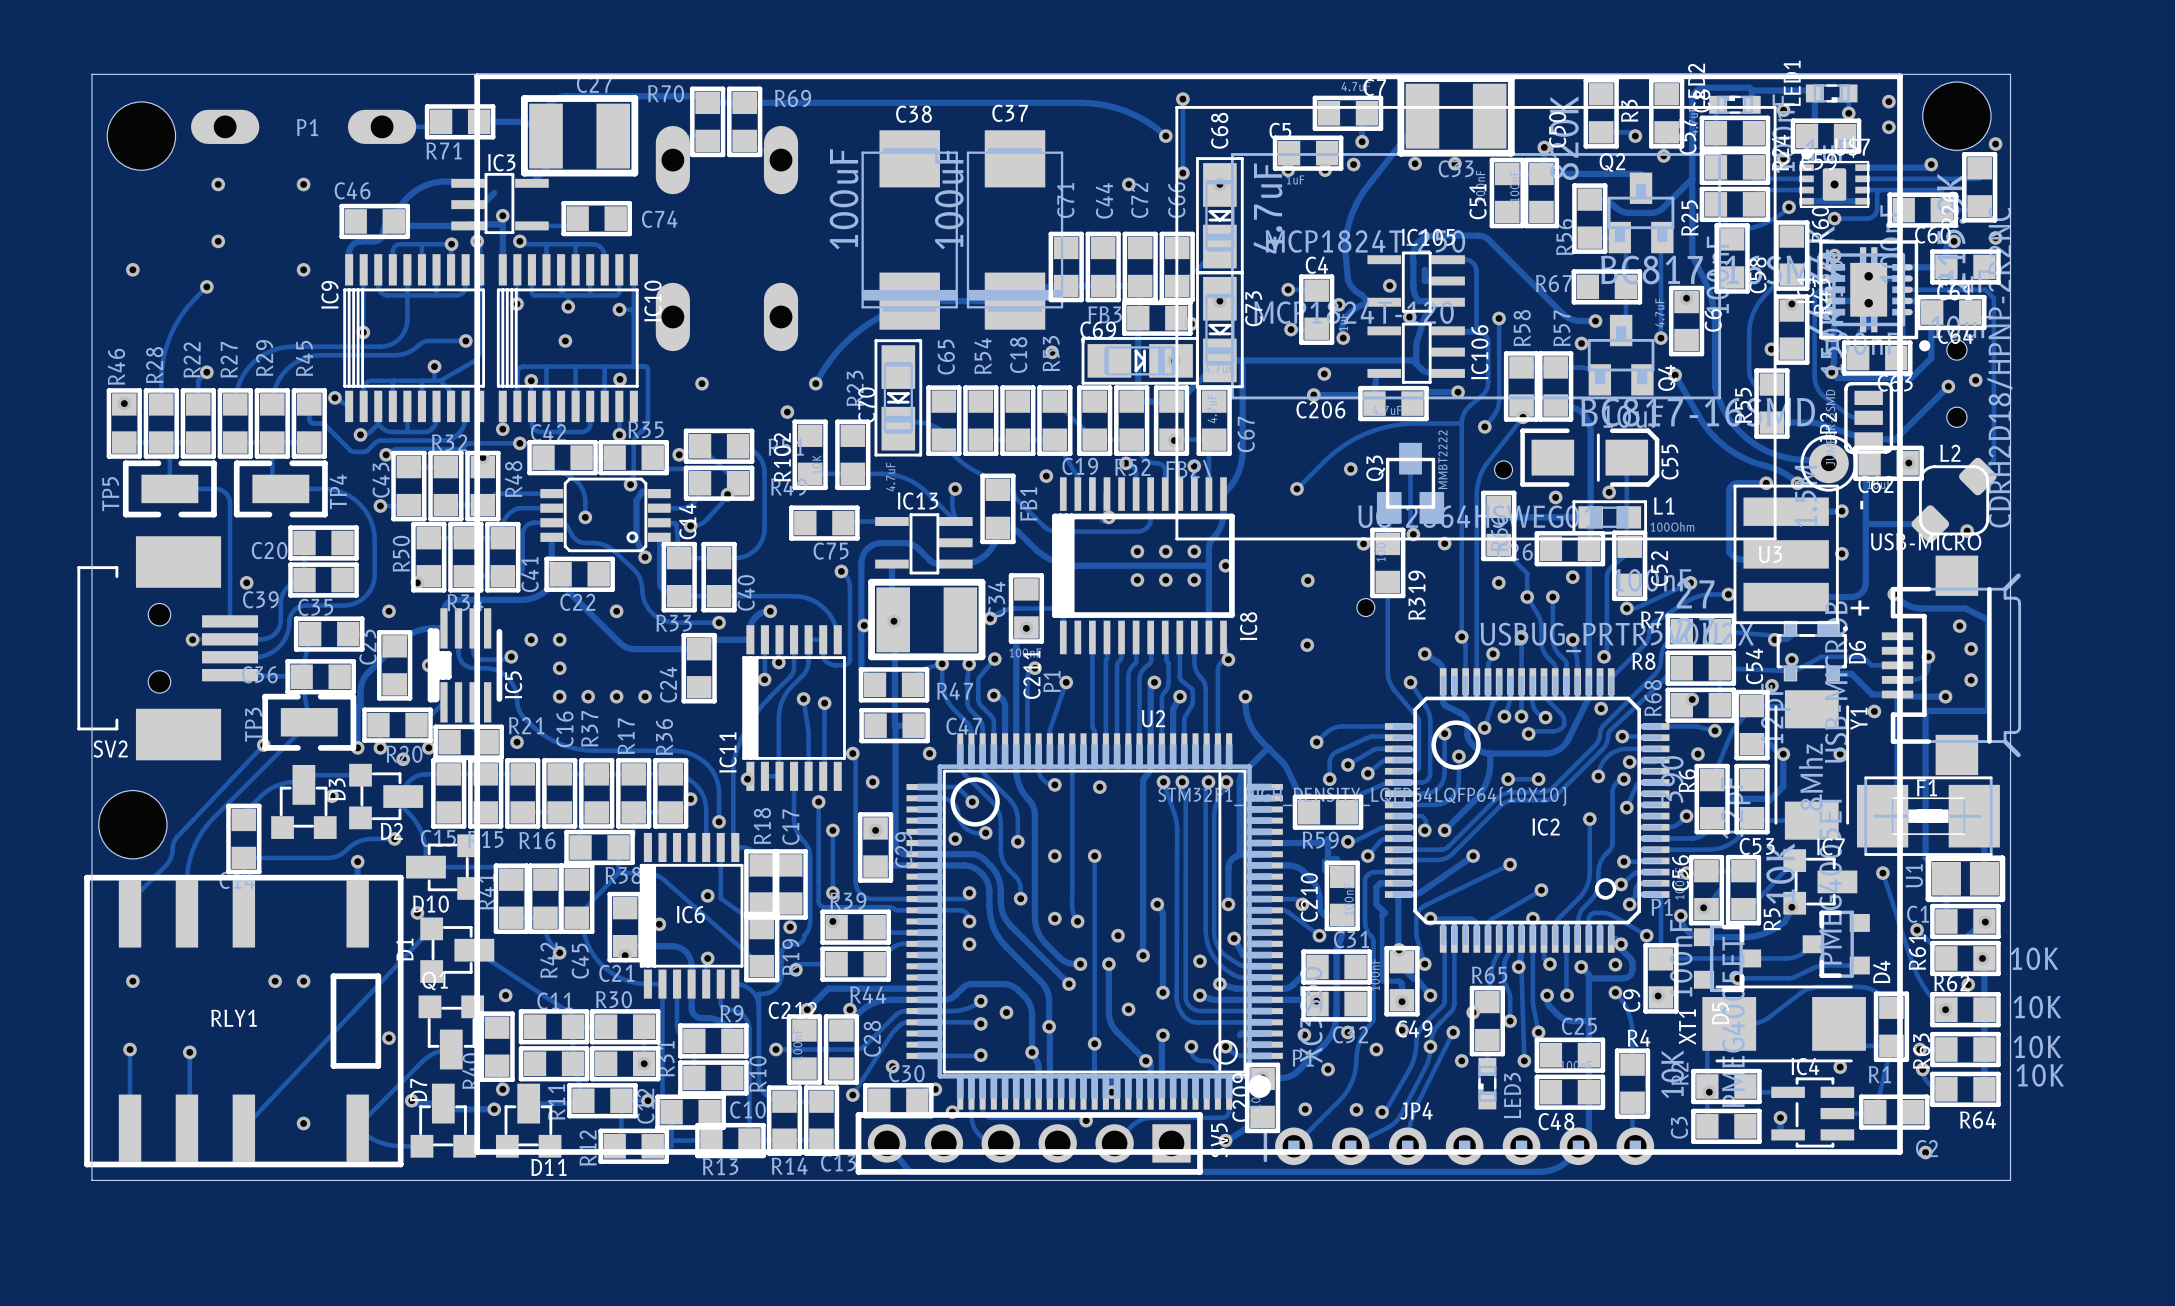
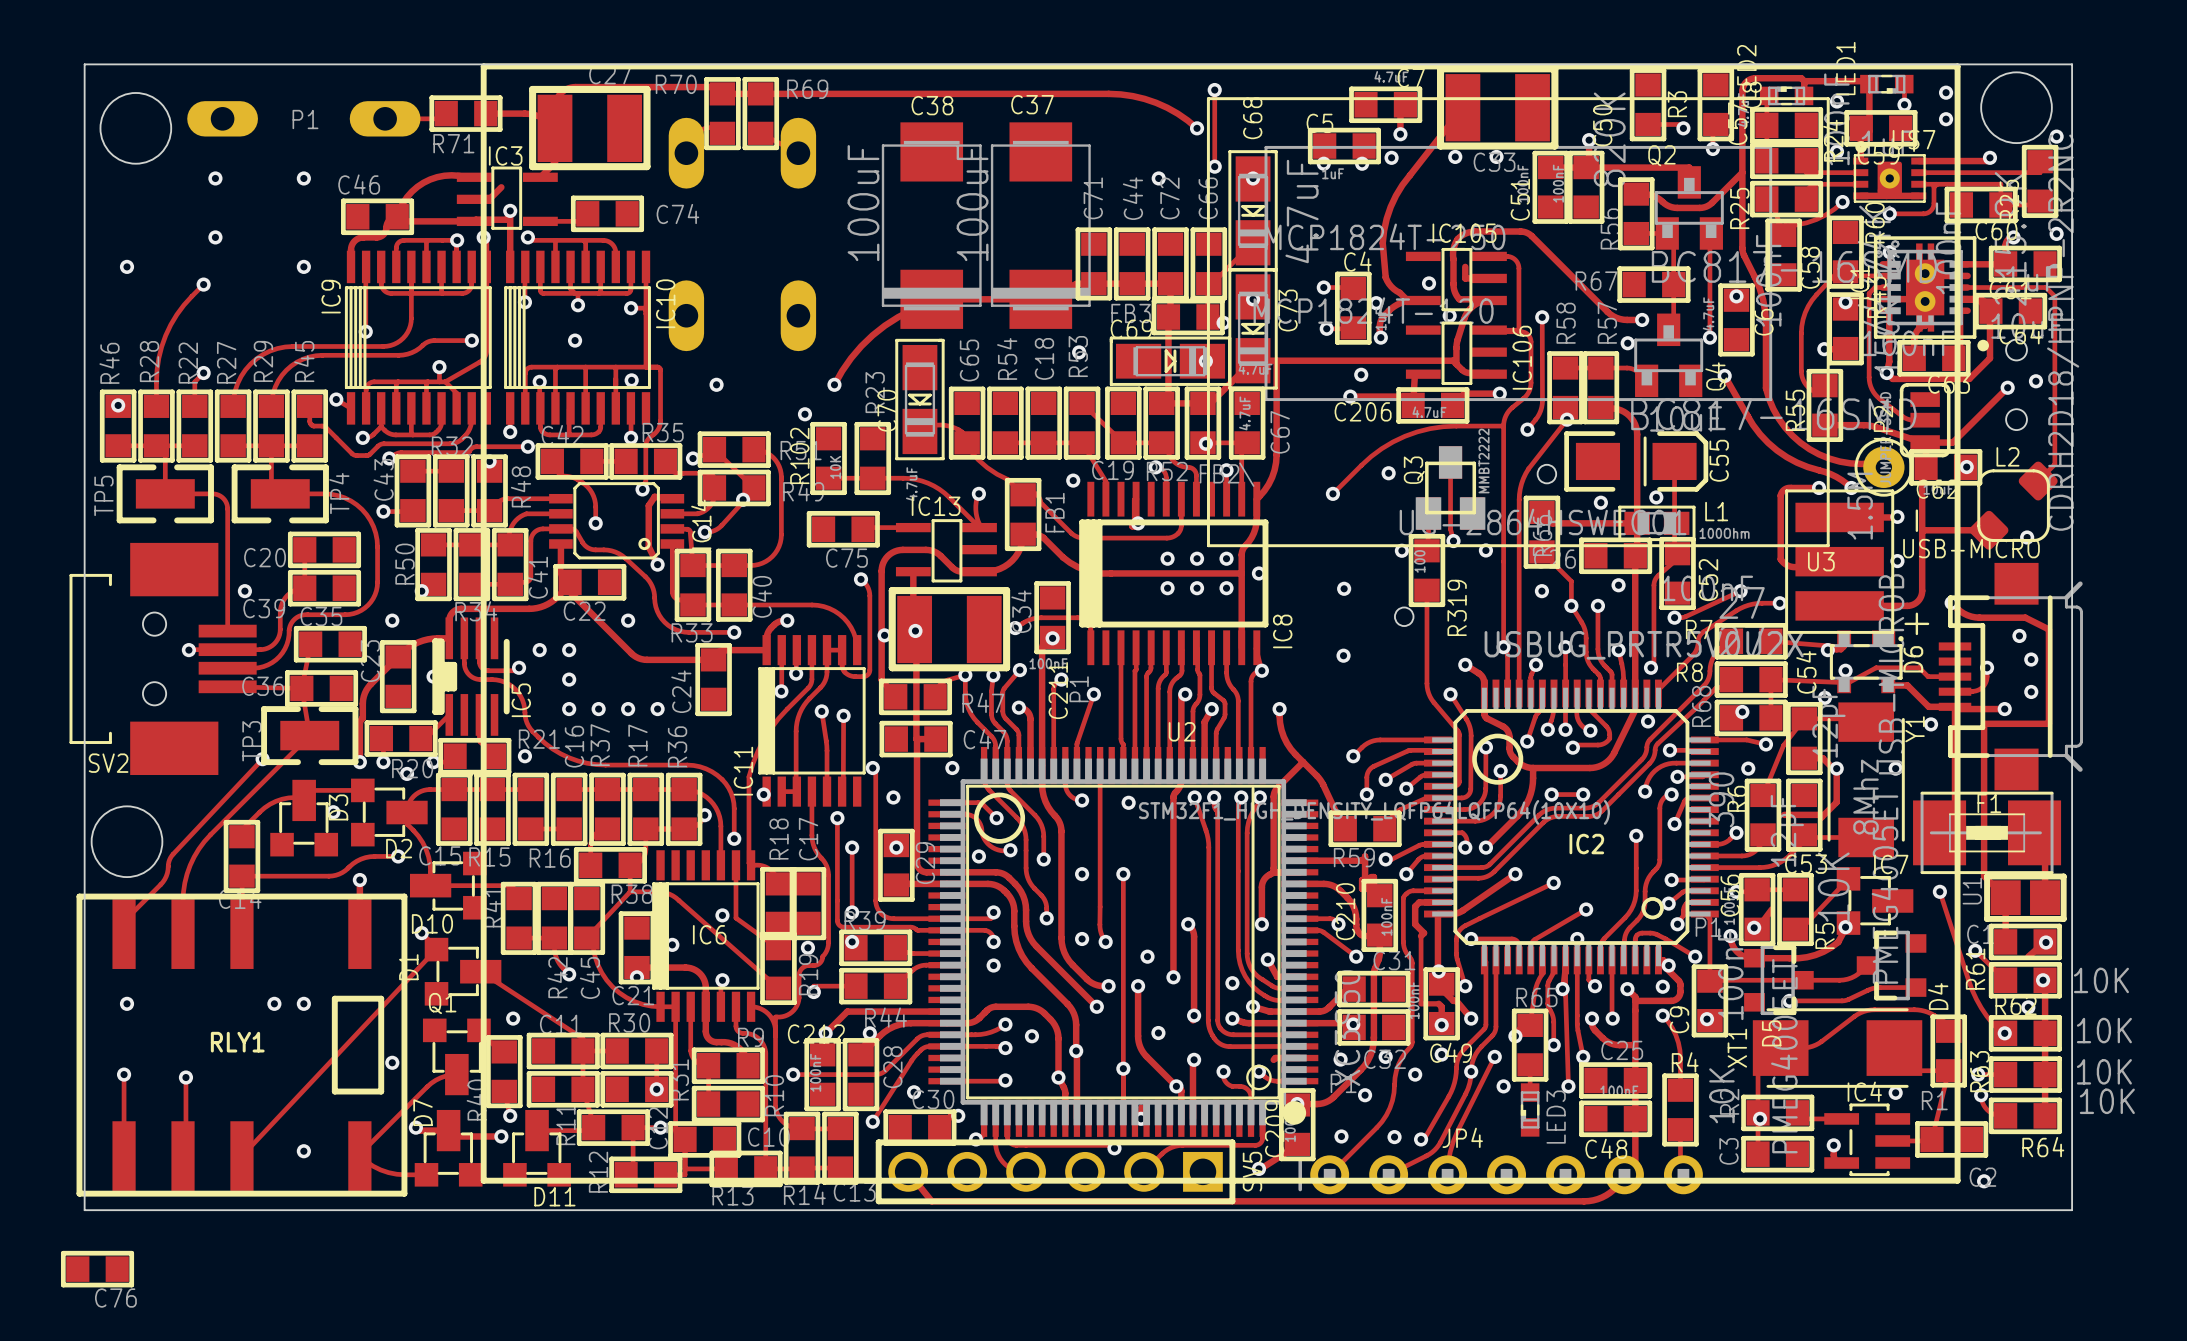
C76: none -> (97, 1269)

